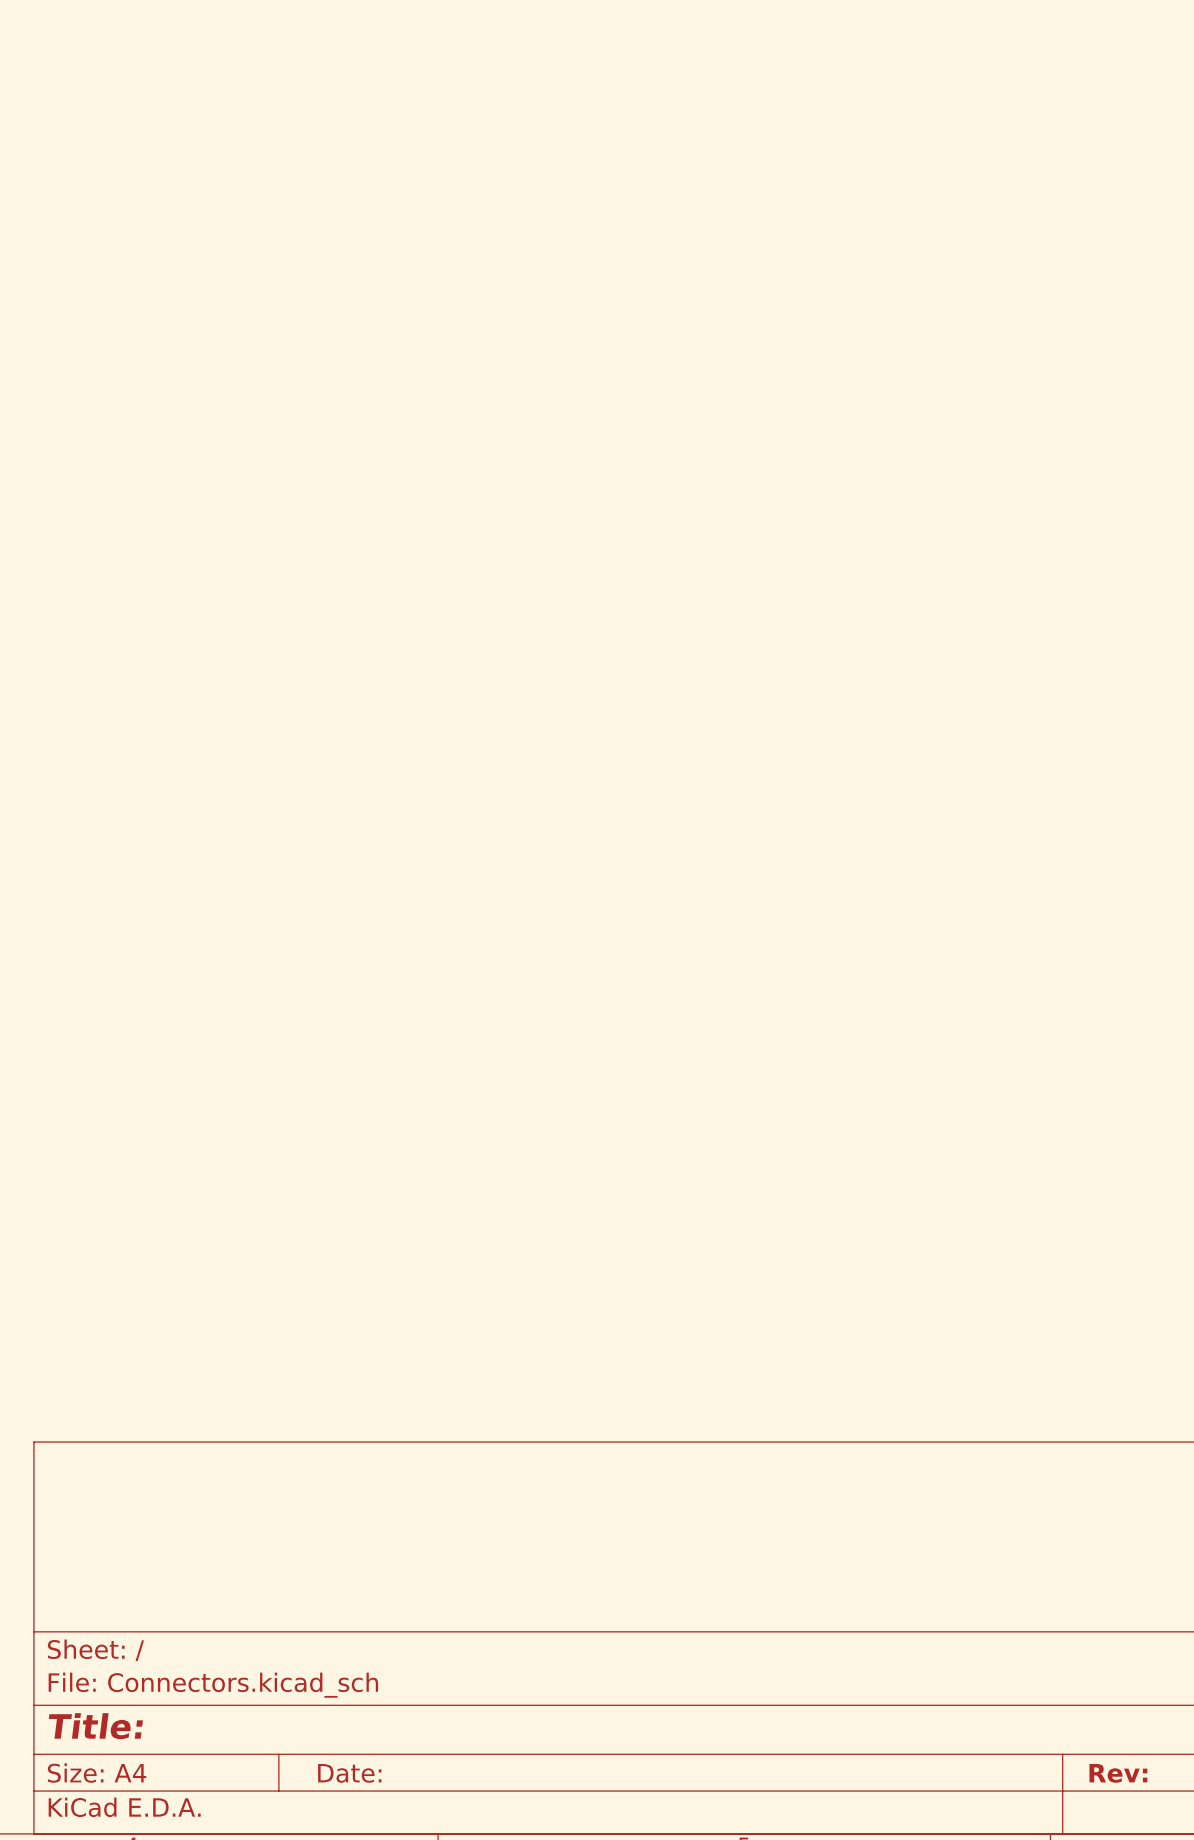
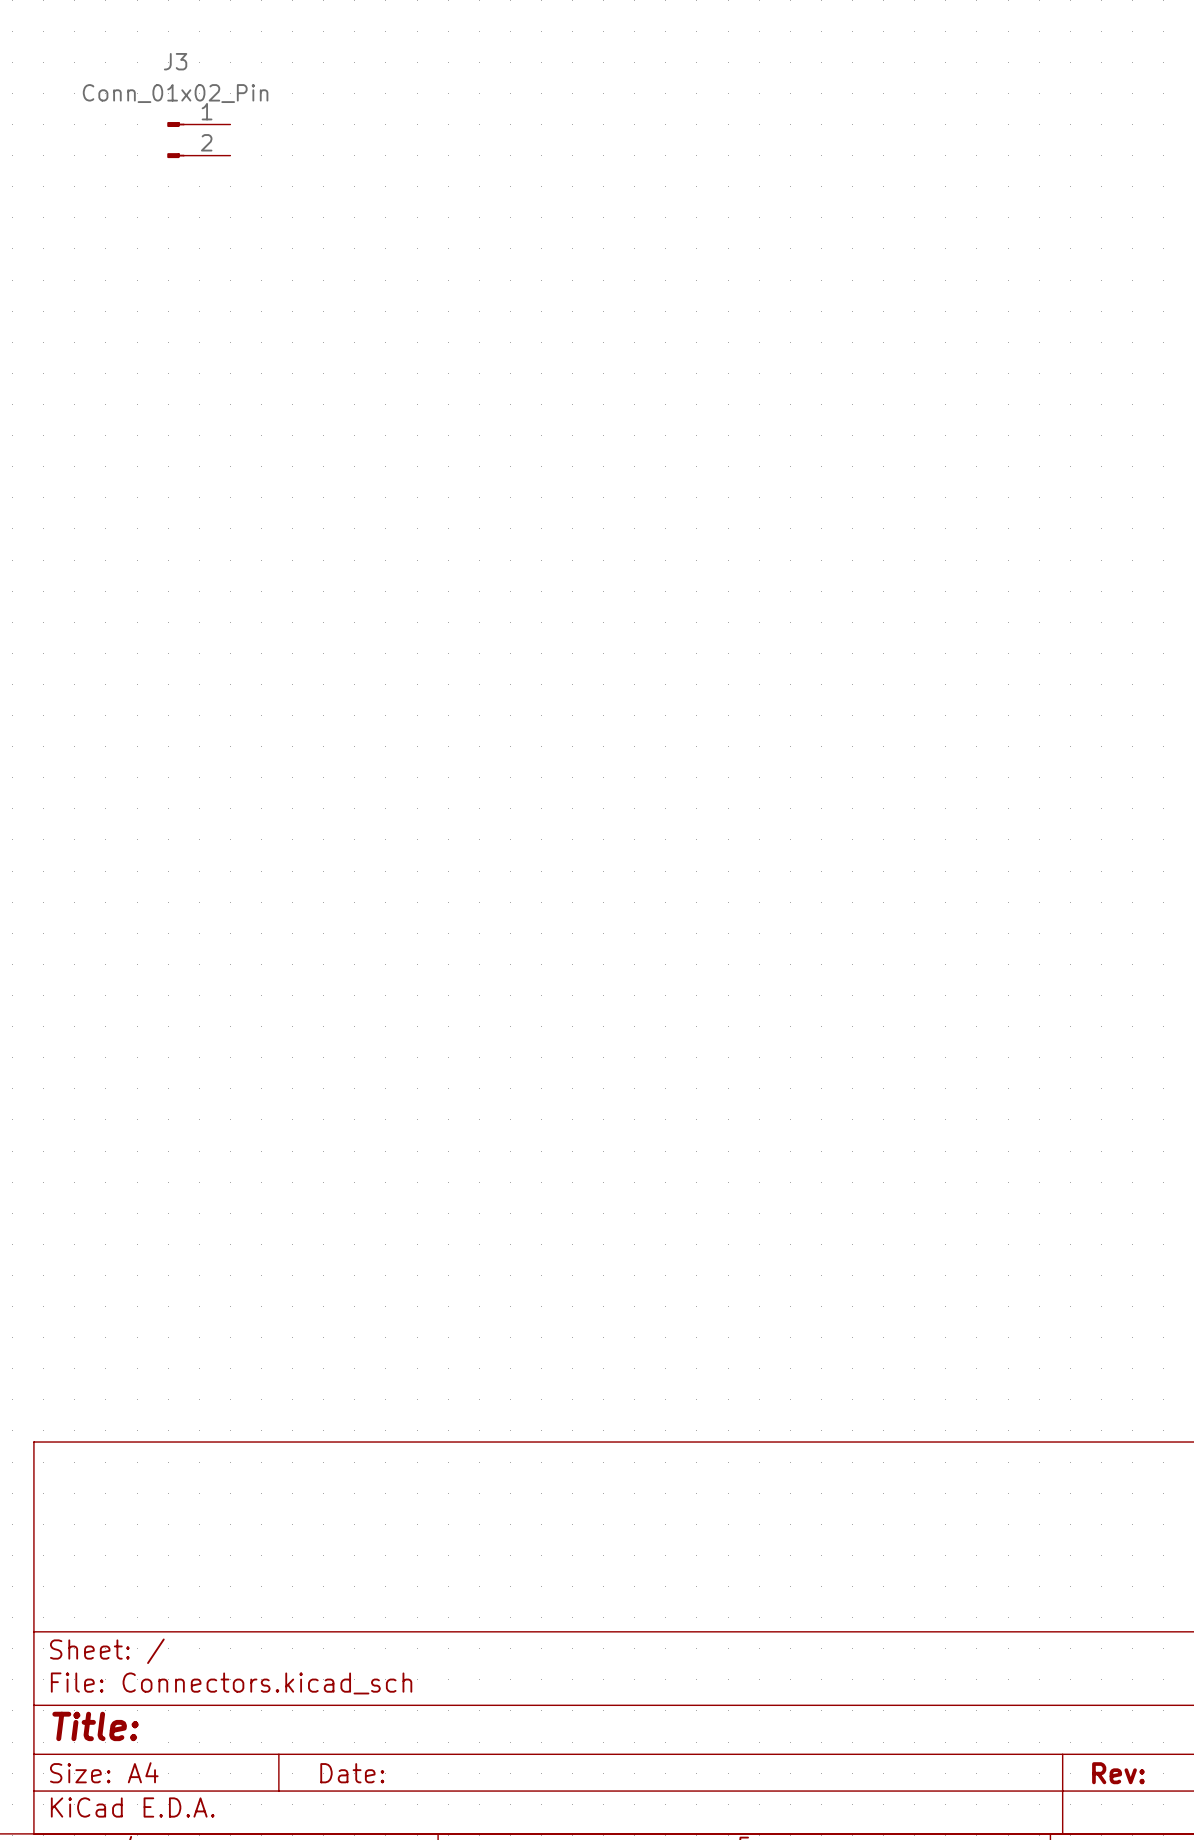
J3: none -> Conn_01x02_Pin (198, 140)

